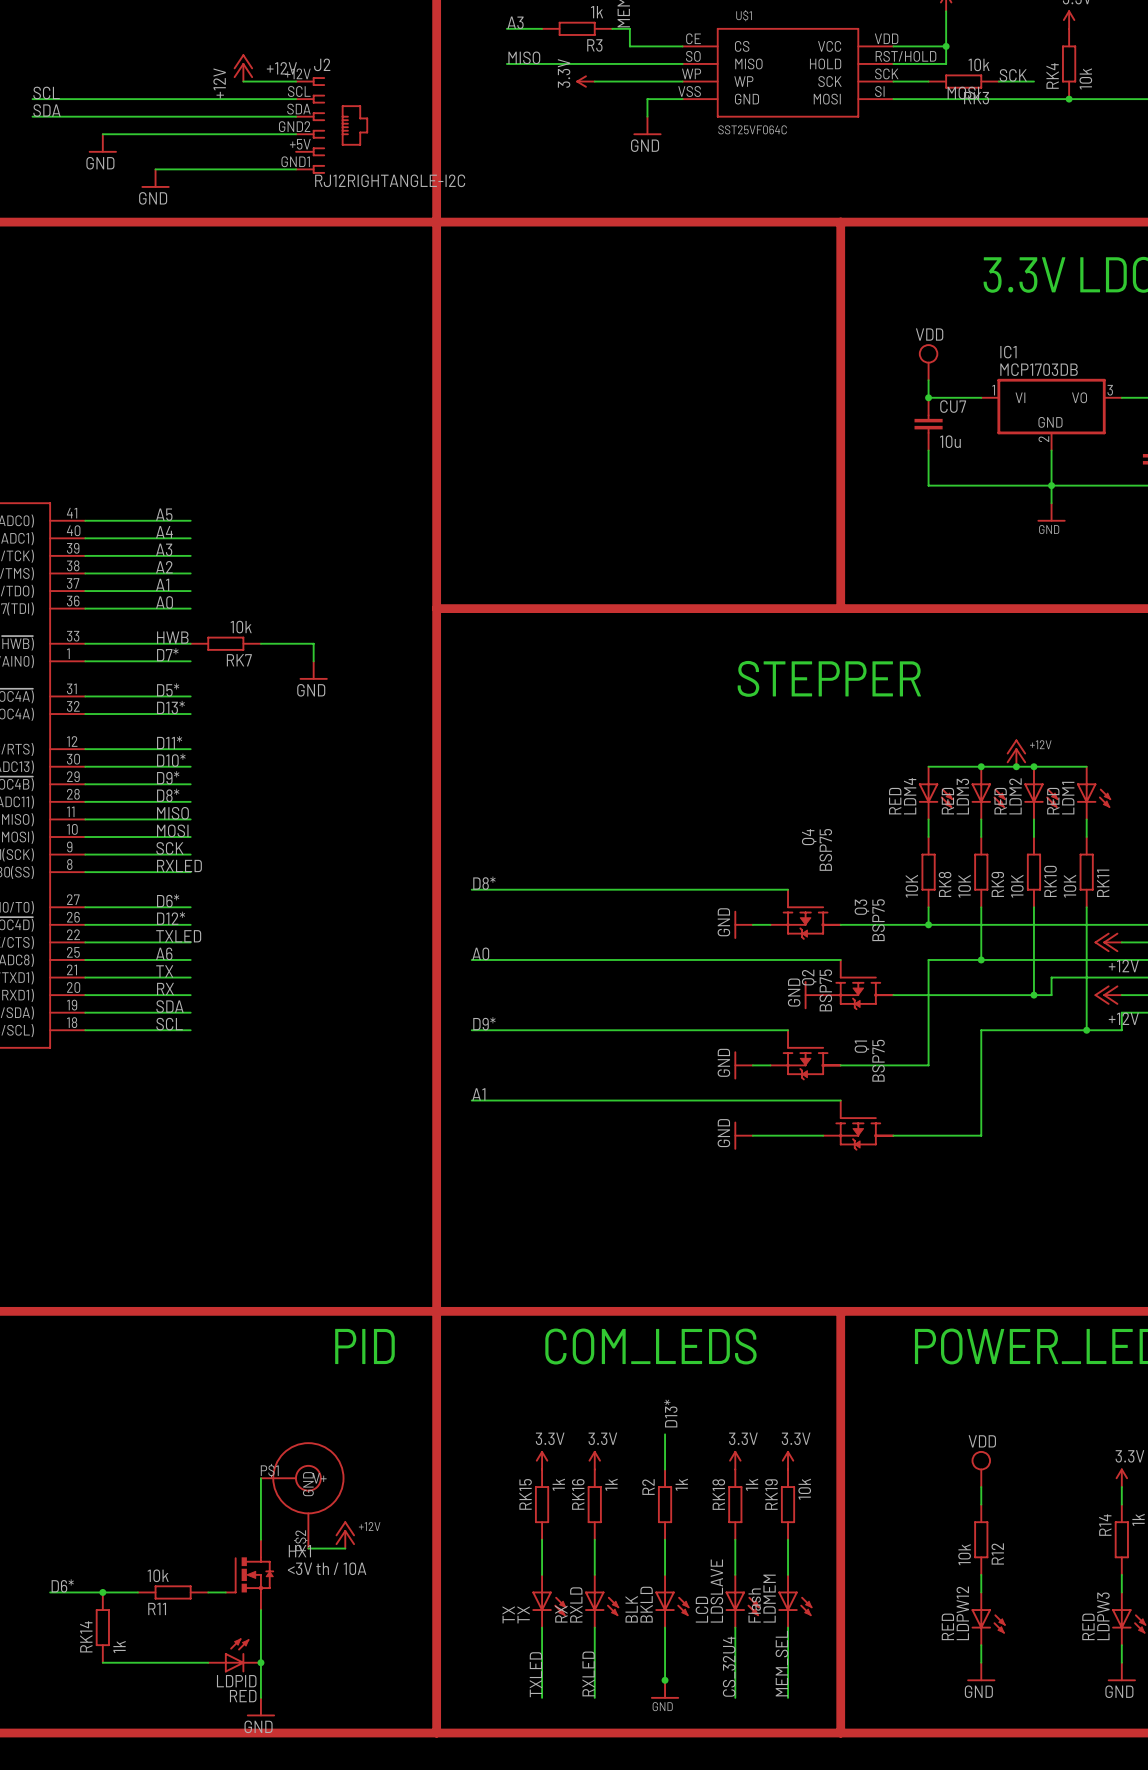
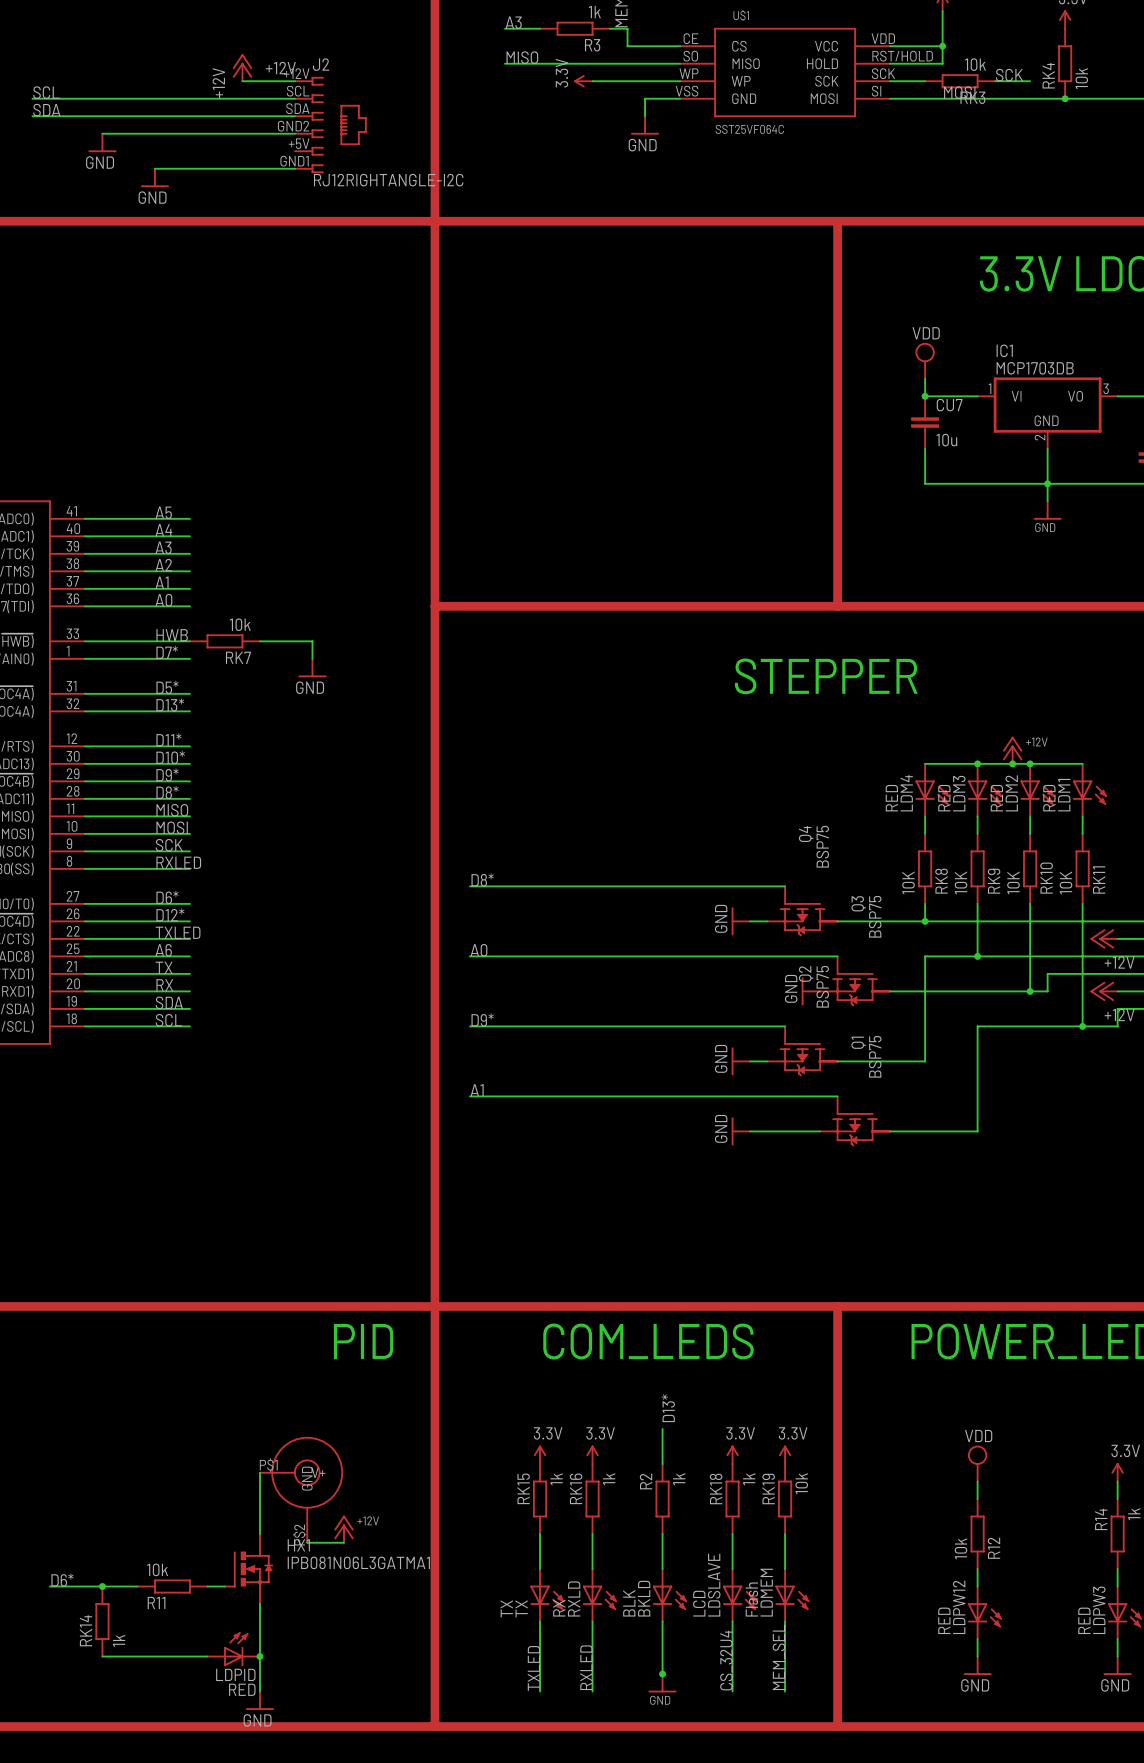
HX1 value: <3V th / 10A (327, 1568) -> IPB081N06L3GATMA1 (358, 1562)

